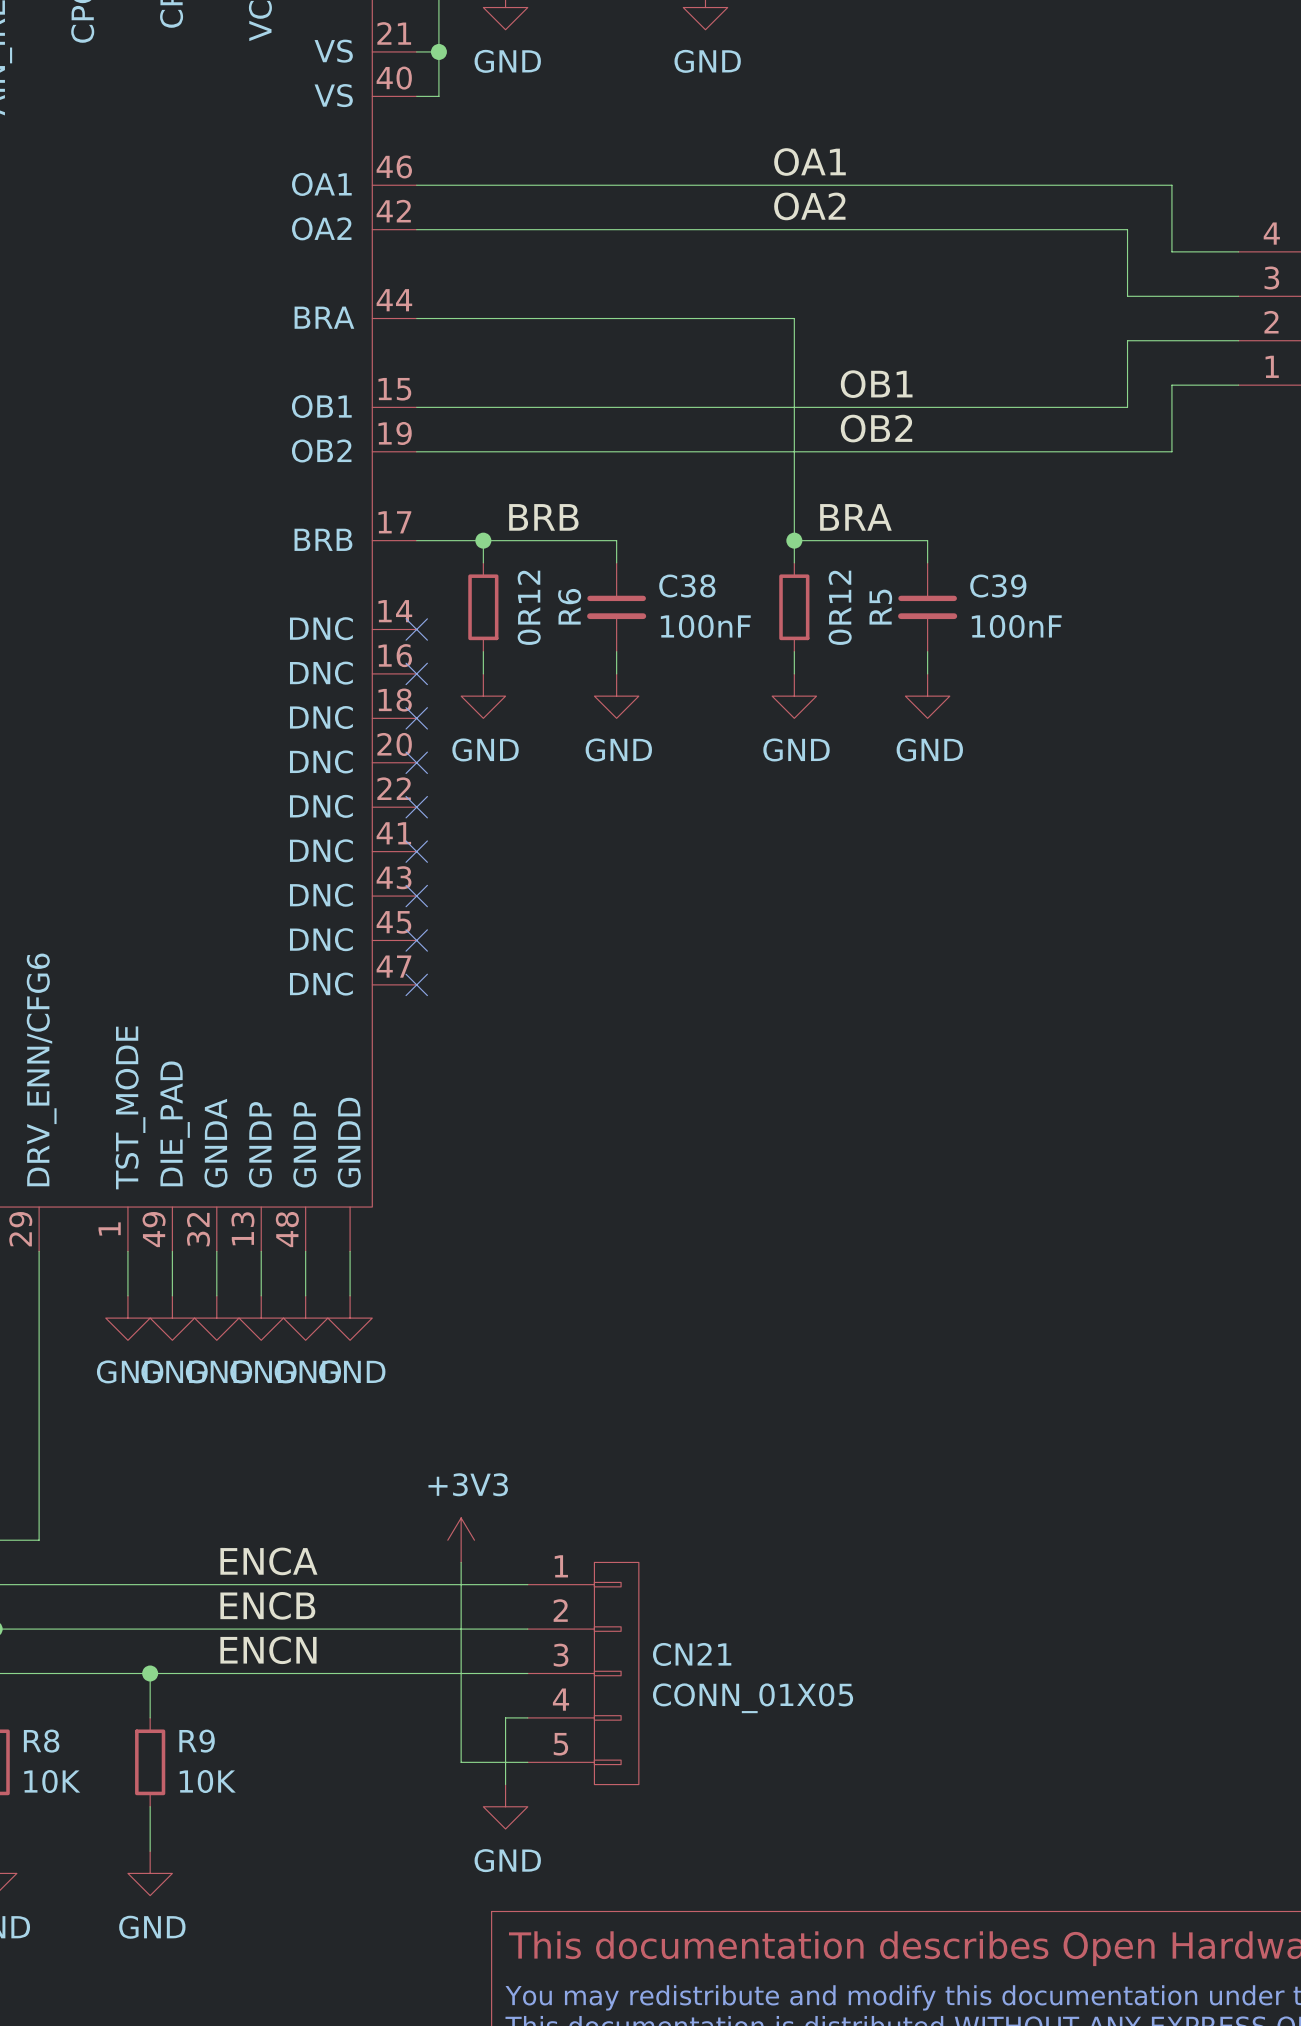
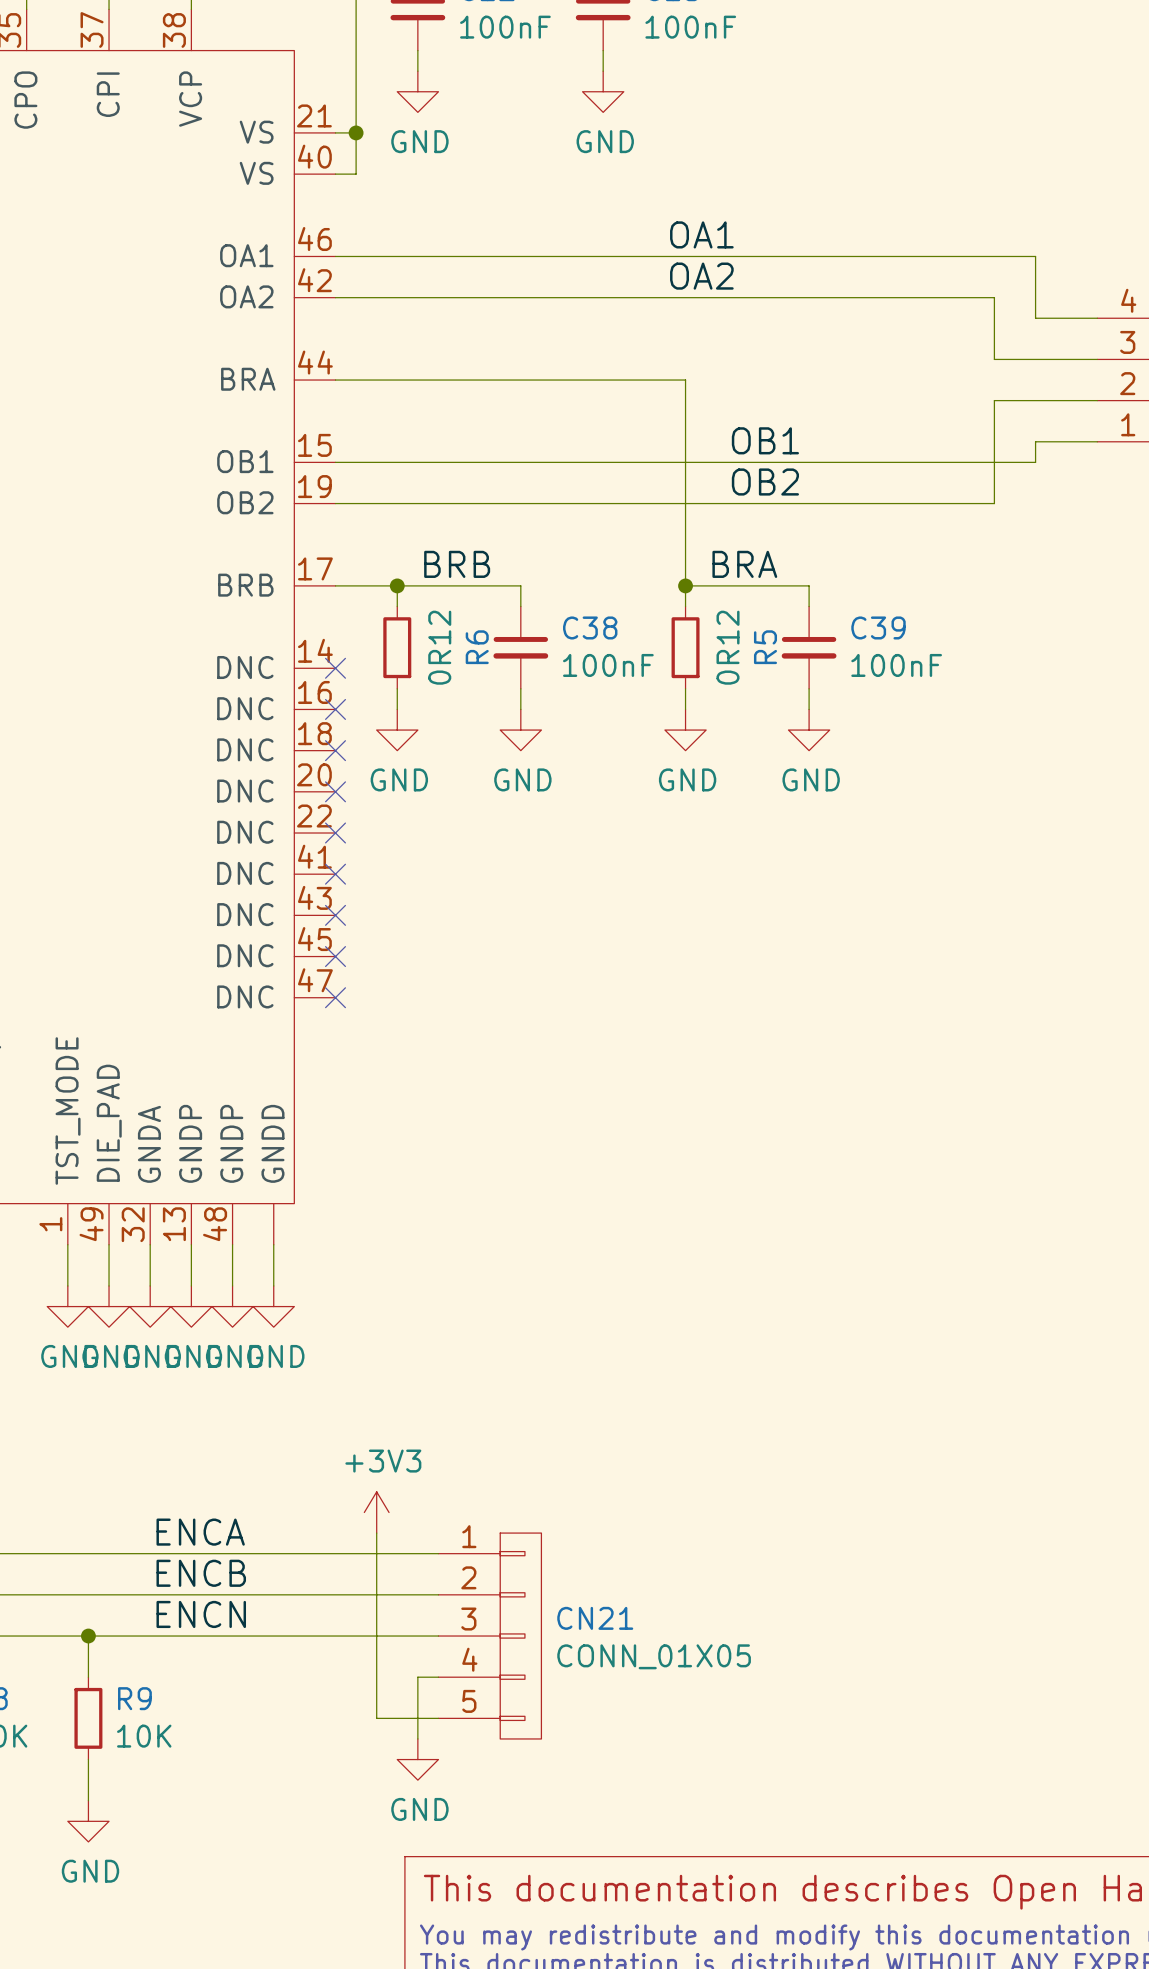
wire: (1171, 407) (1171, 451) (1127, 451) -> (1035, 462) (994, 462) (994, 503)

